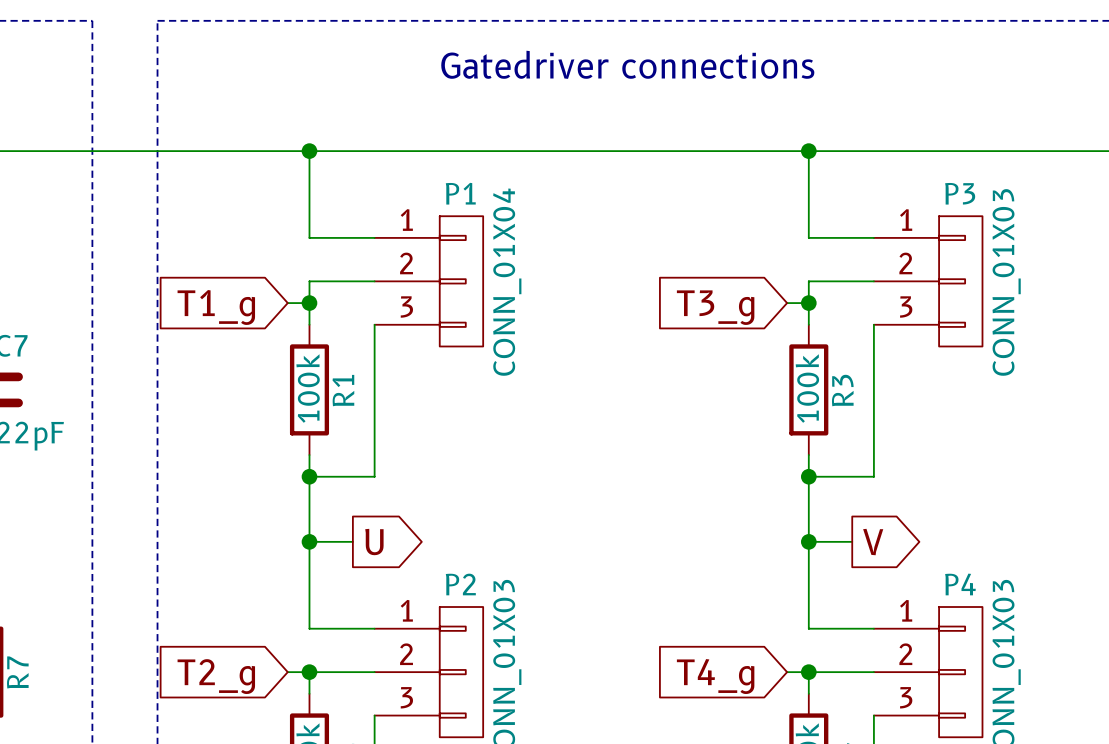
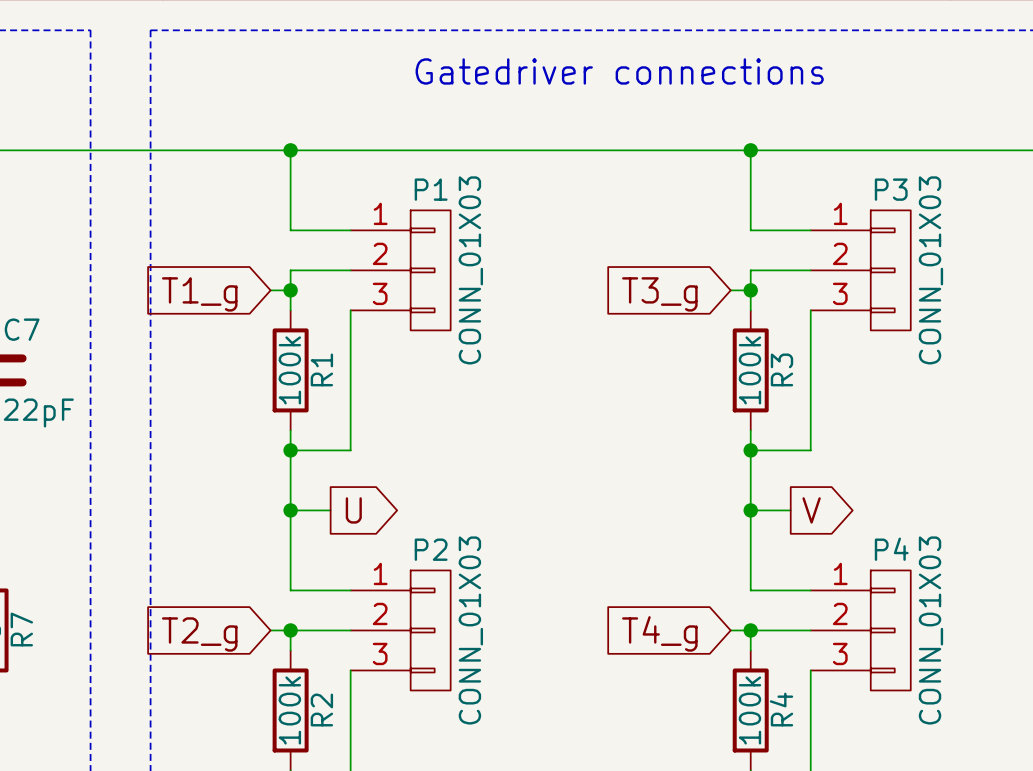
P1 value: CONN_01X04 (507, 282) -> CONN_01X03 (470, 270)

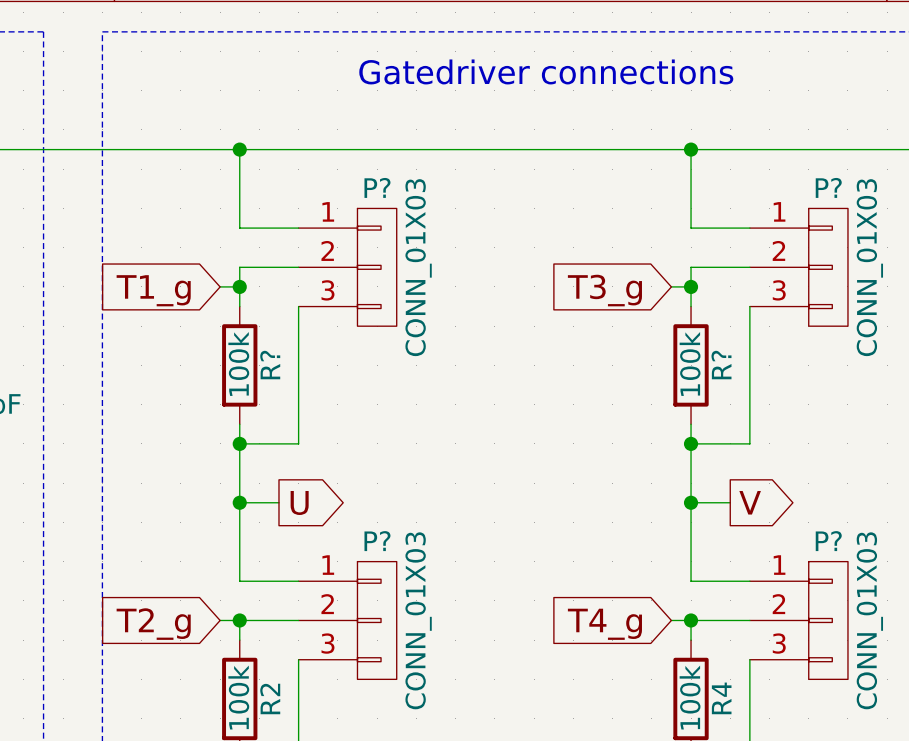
P1 name: P1 (431, 189) -> P? (377, 187)
P3 name: P3 (891, 189) -> P? (828, 187)
R1 name: R1 (321, 369) -> R? (270, 365)
R3 name: R3 (781, 369) -> R? (721, 365)
P2 name: P2 (431, 549) -> P? (377, 541)
P4 name: P4 (891, 549) -> P? (828, 541)

